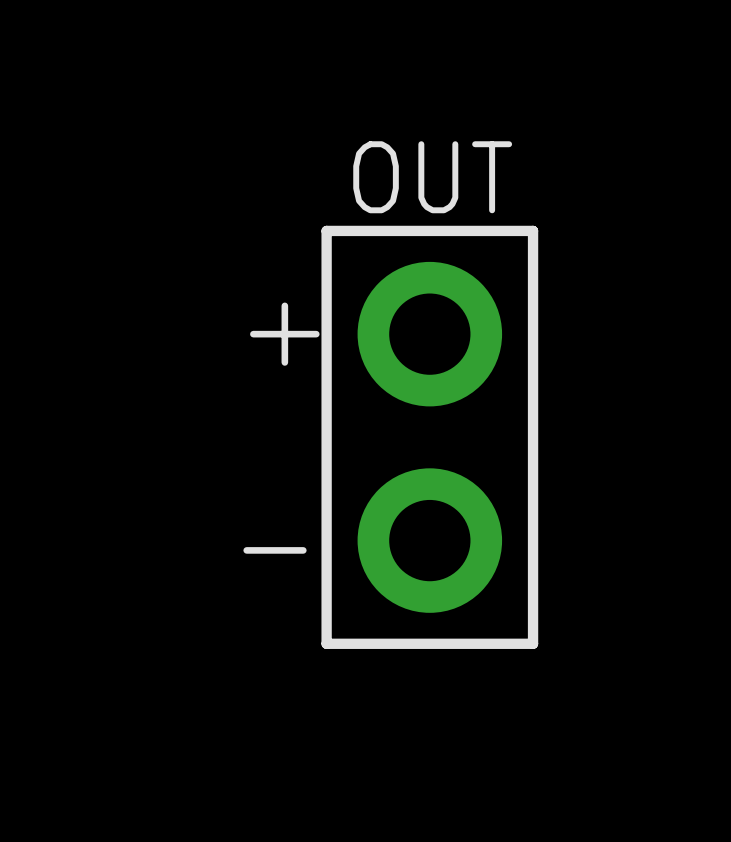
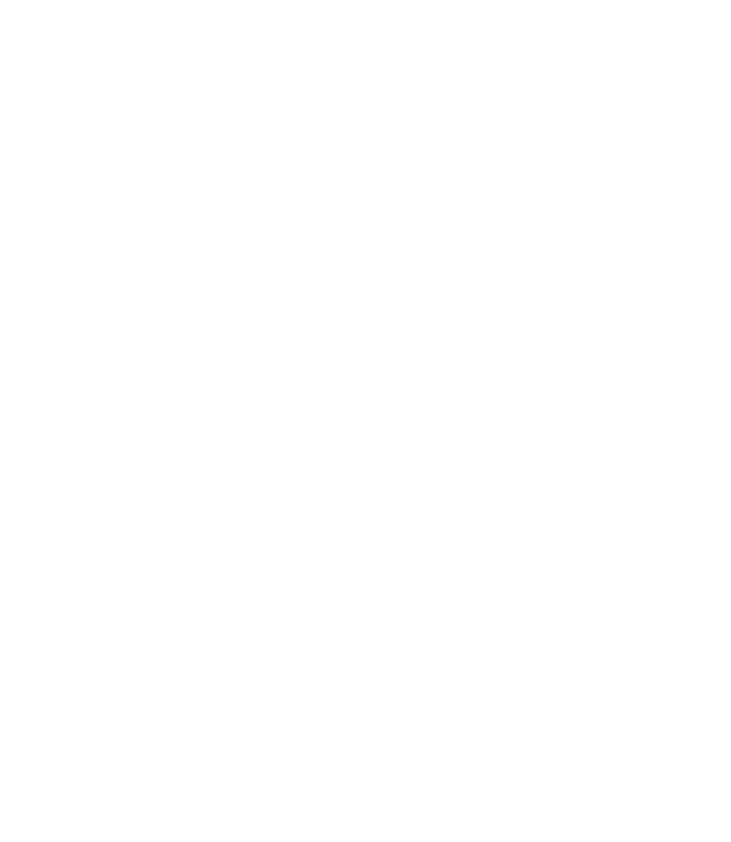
OUT: (429, 437) -> none

